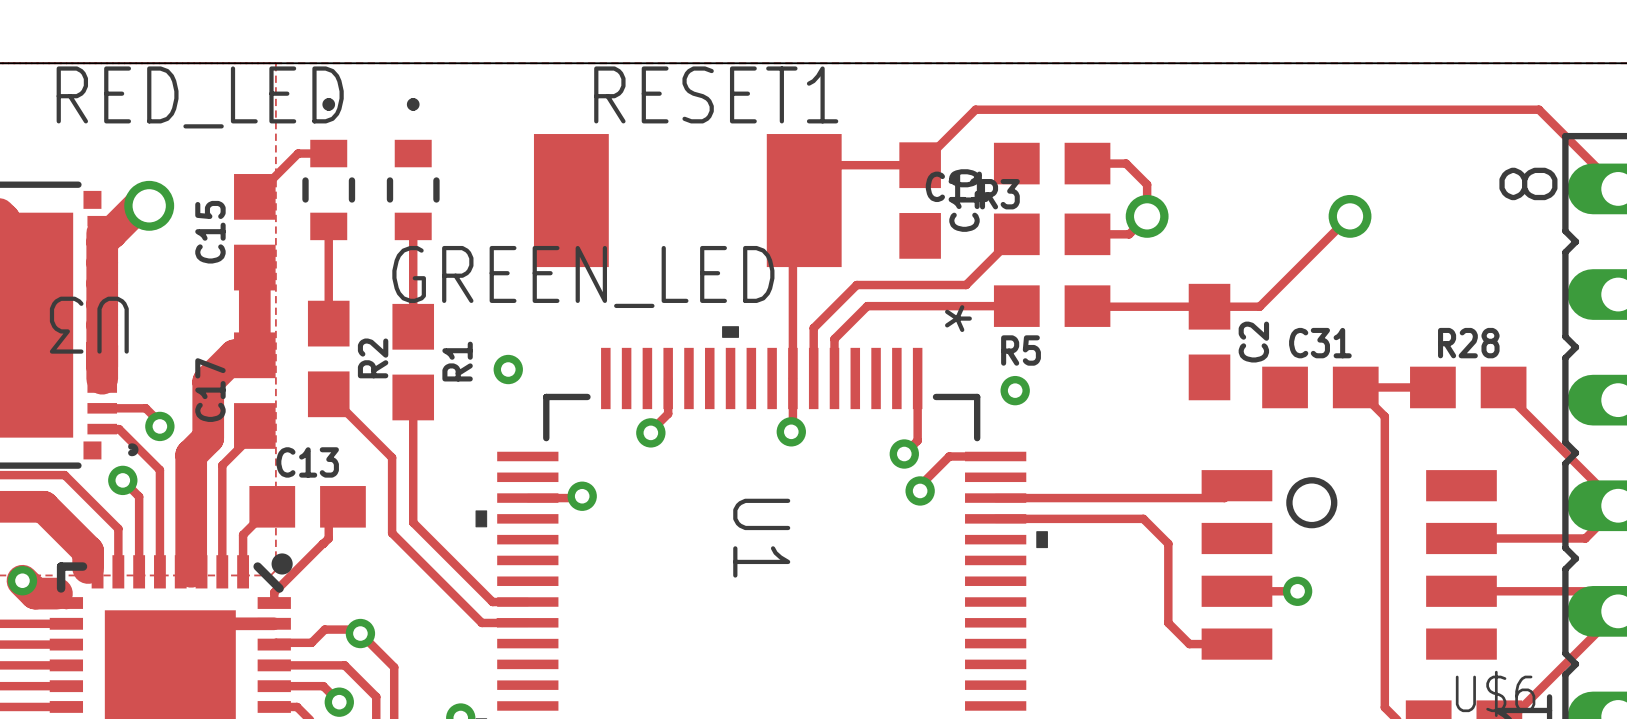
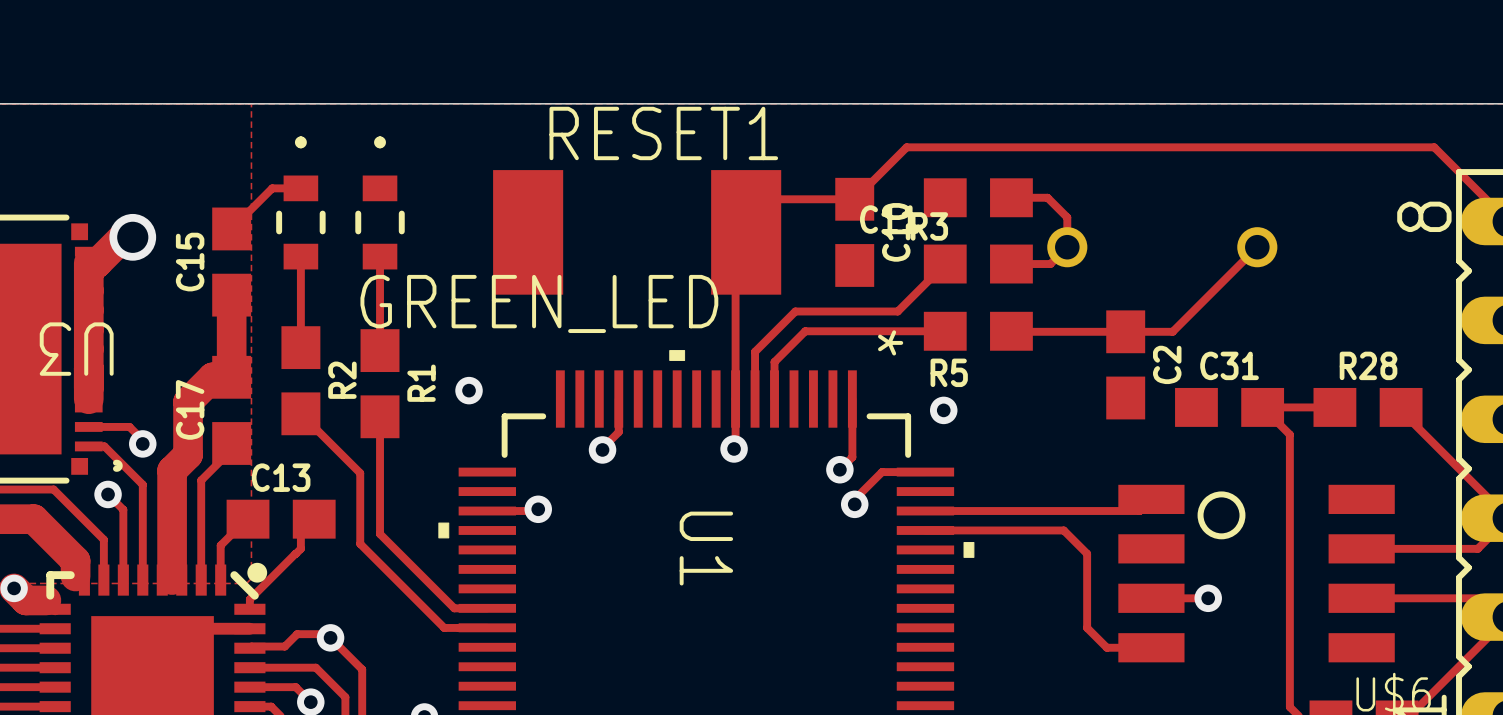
RED_LED name: RED_LED (200, 97) -> none

